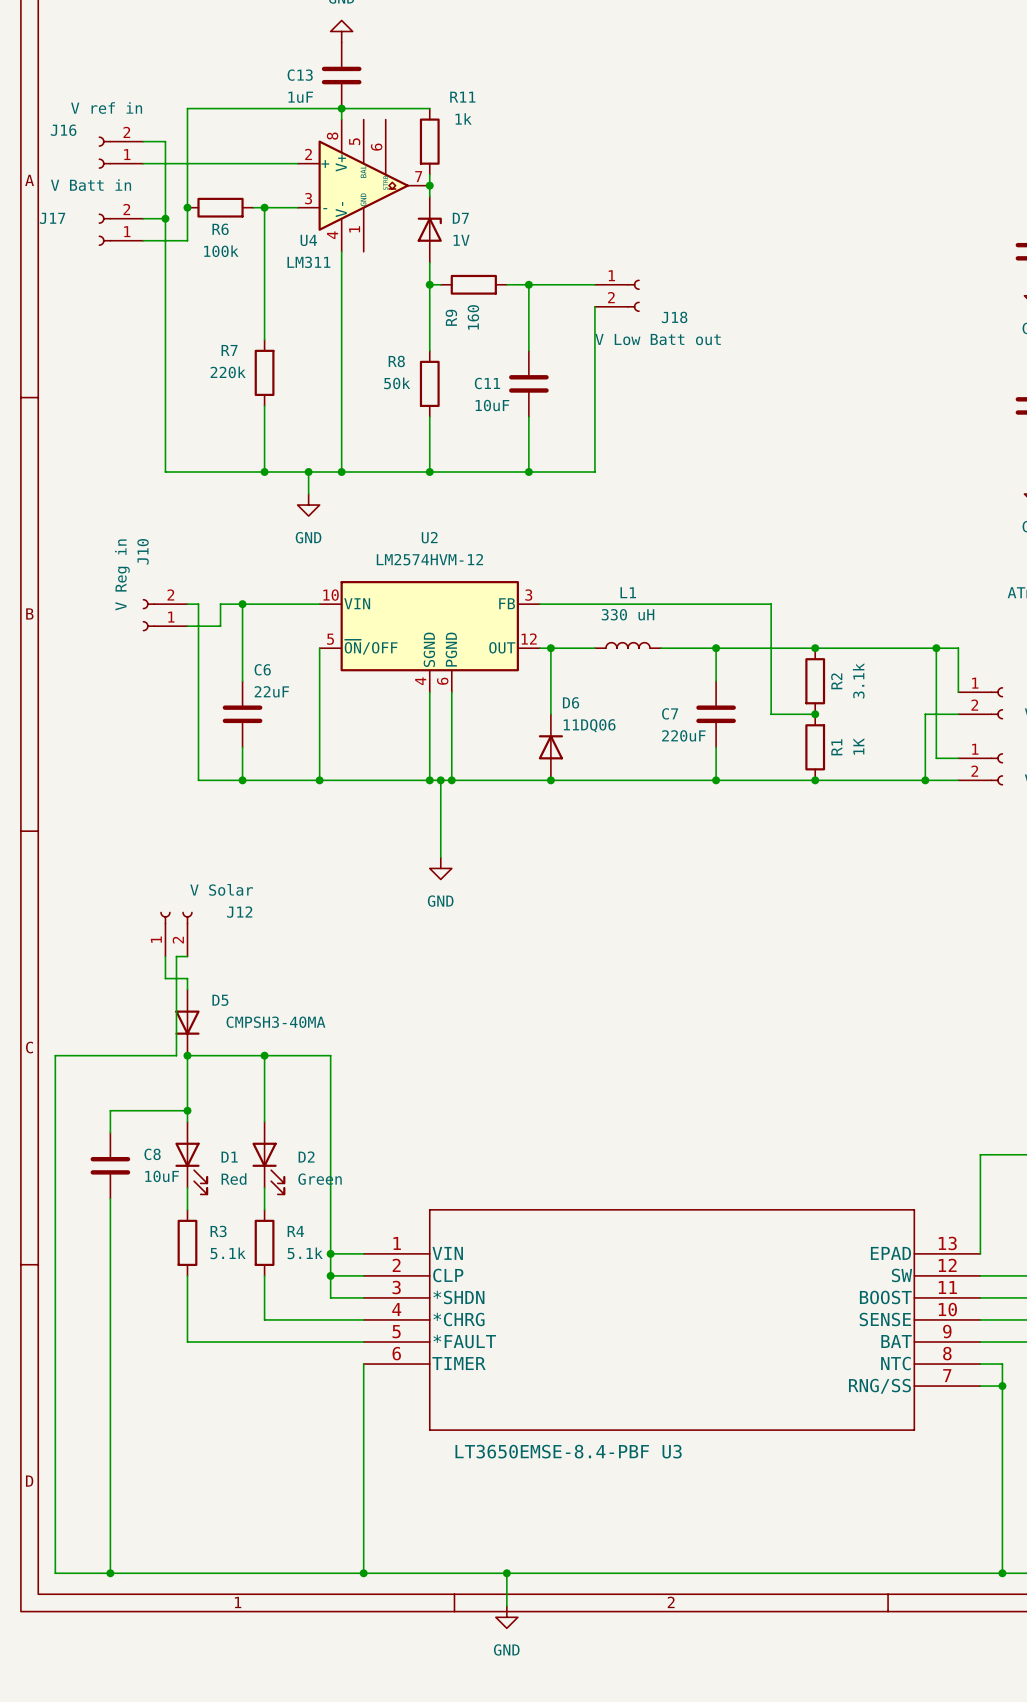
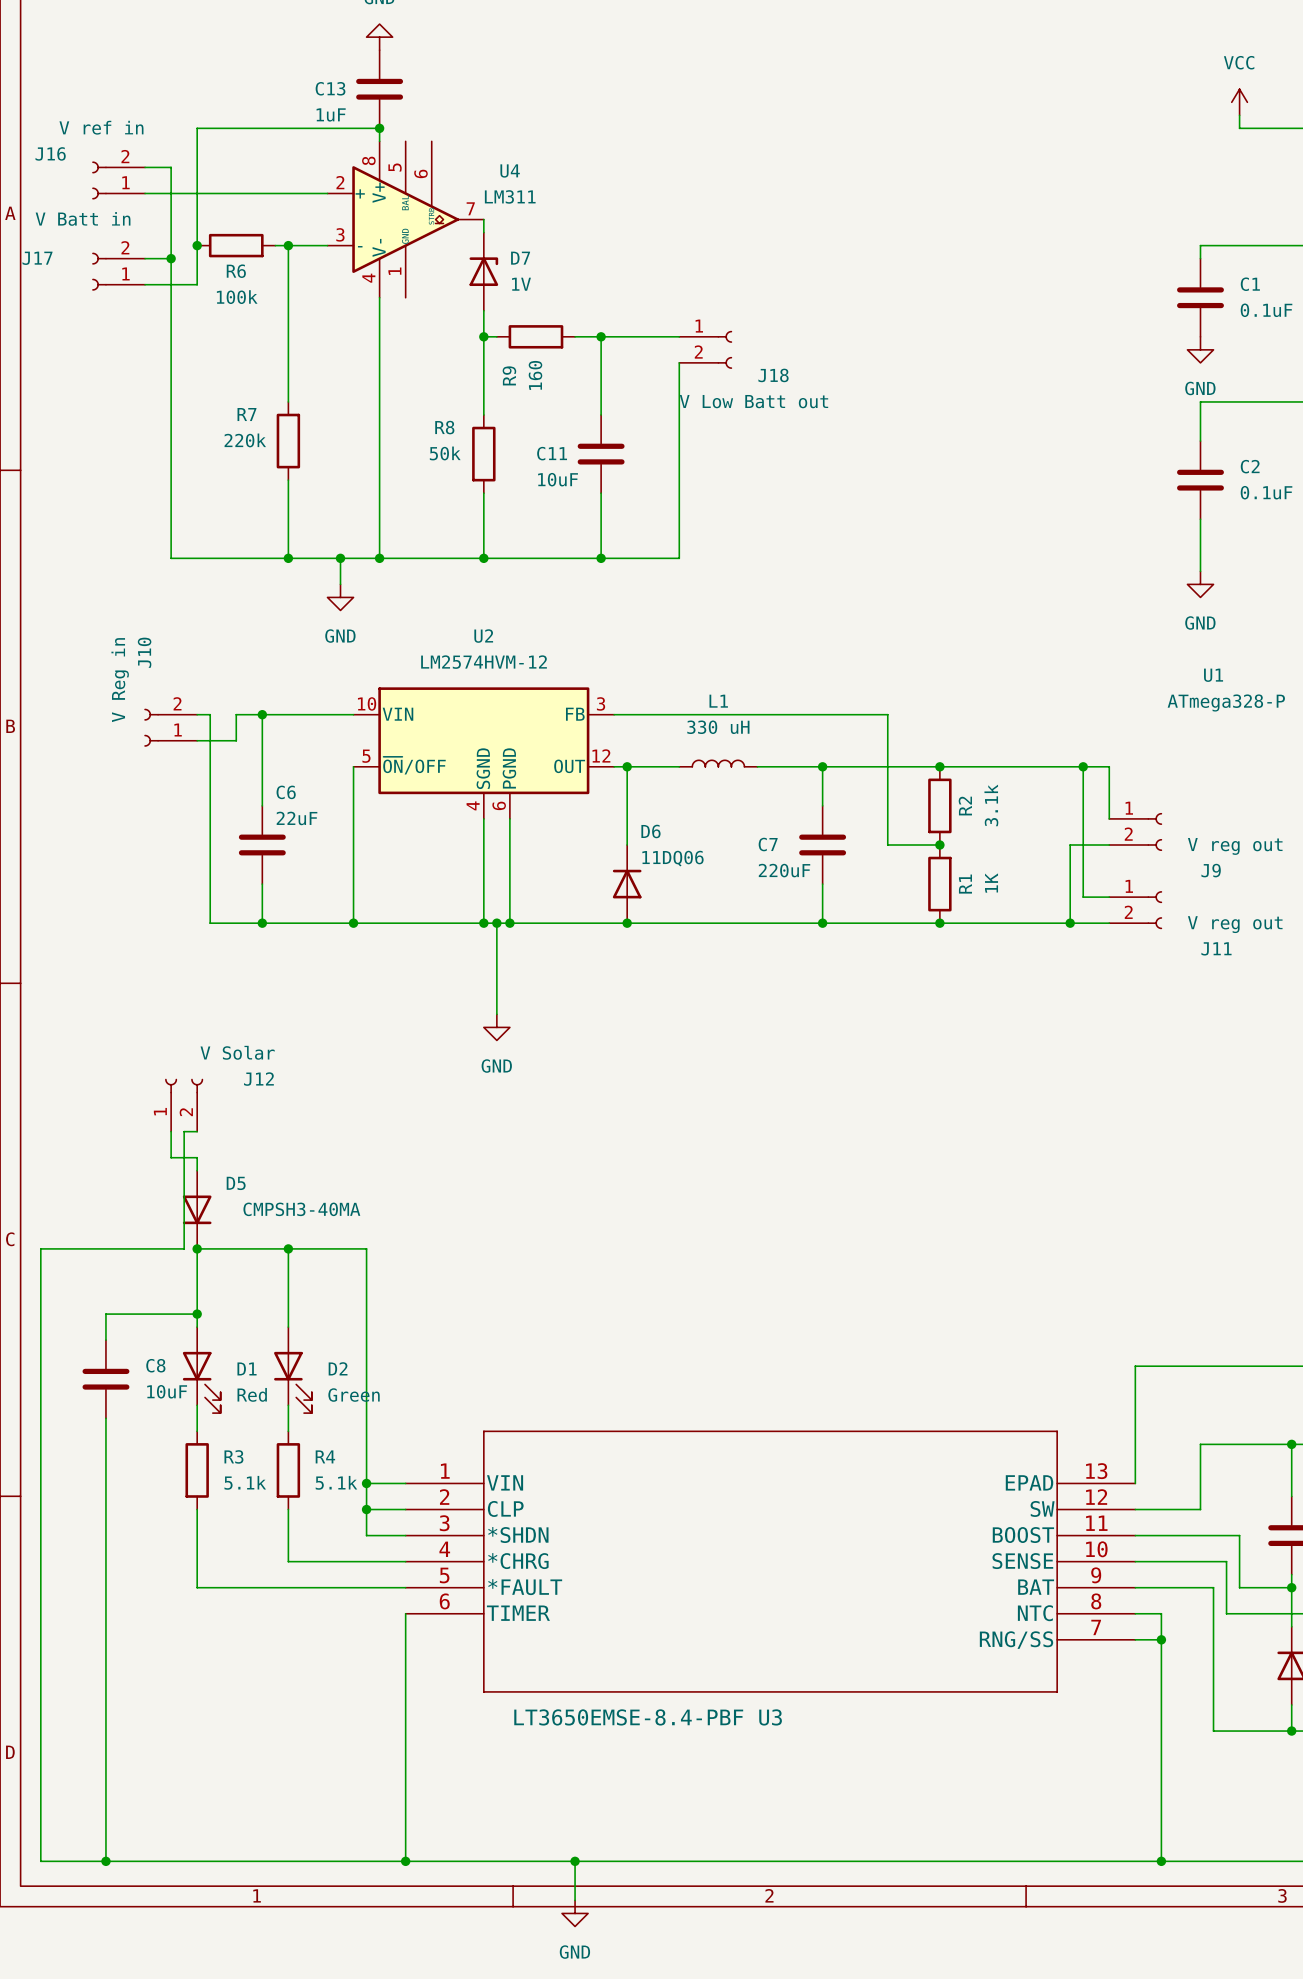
wire: (341, 108) (429, 108) -> none
R11: 1k (429, 141) -> none
wire: (429, 174) (429, 185) -> none
junction: (429, 185) -> none
U4 name position: U4 (308, 240) -> U4 (510, 170)
U4 value position: LM311 (308, 262) -> LM311 (510, 196)

